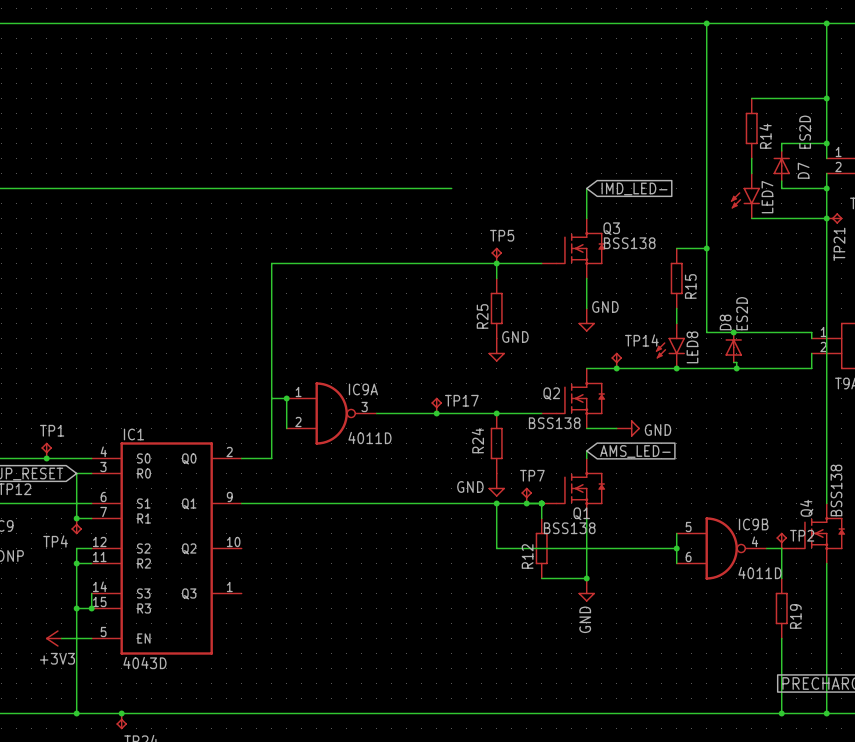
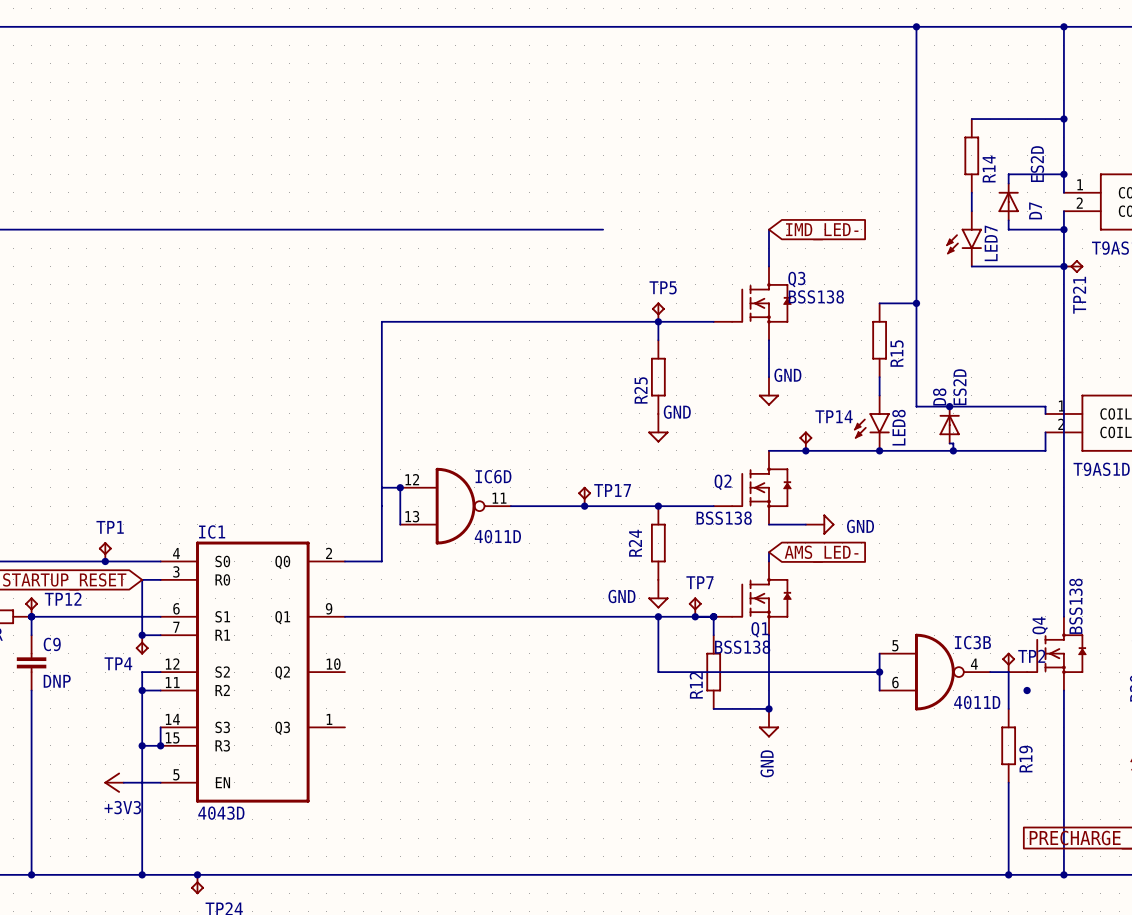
IC9A name: IC9A (363, 389) -> IC6D (493, 476)
IC9A pin number: 1 (298, 391) -> 12 (412, 479)
IC9A pin number: 3 (364, 406) -> 11 (499, 498)
IC9A pin number: 2 (298, 421) -> 13 (412, 516)
IC9B name: IC9B (753, 524) -> IC3B (972, 642)
junction: none -> (1027, 690)

